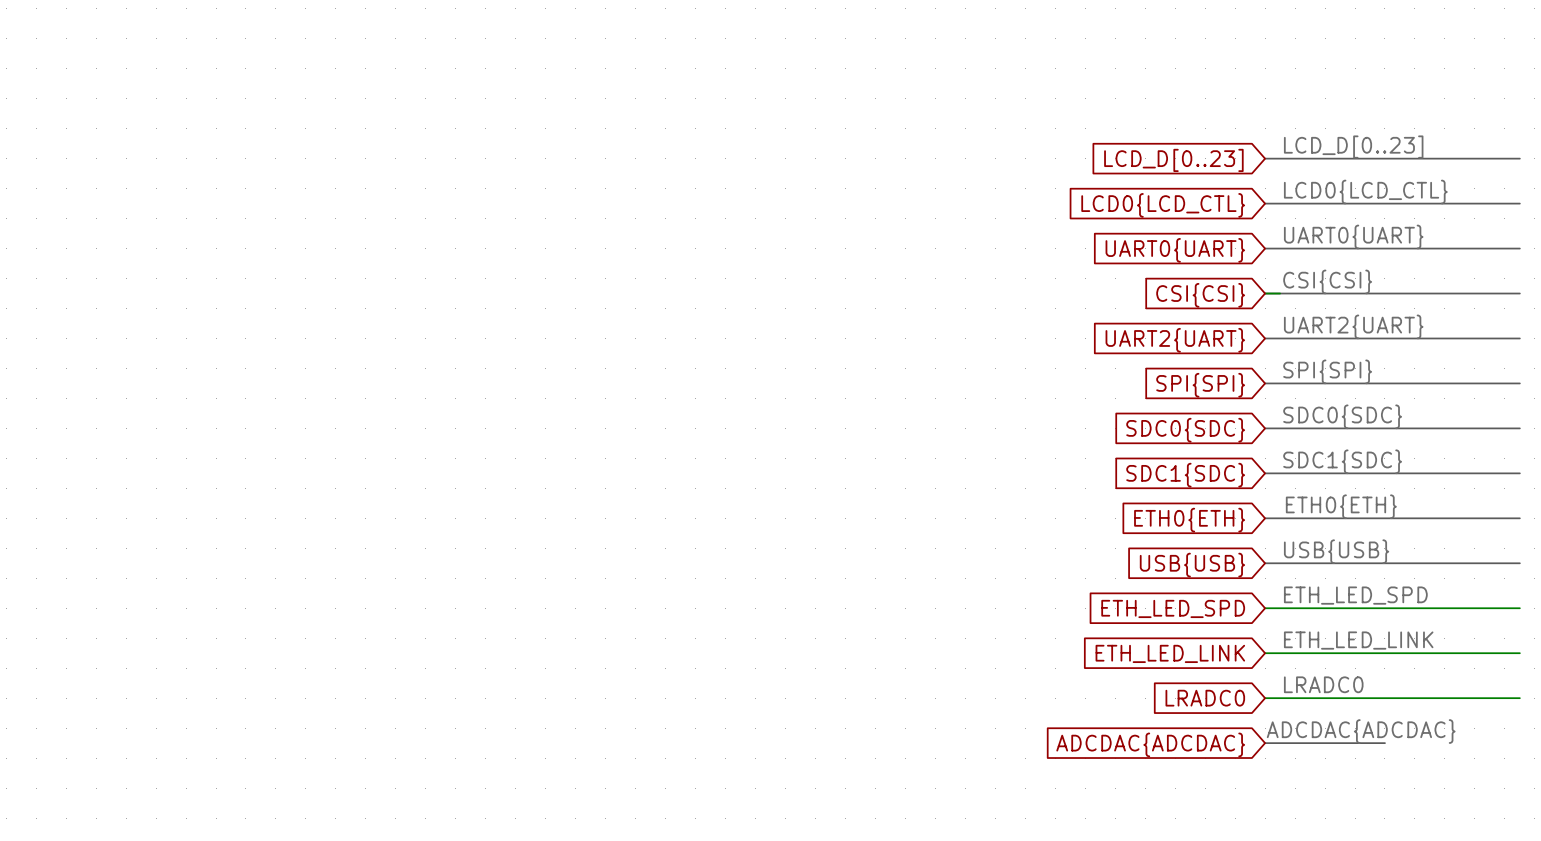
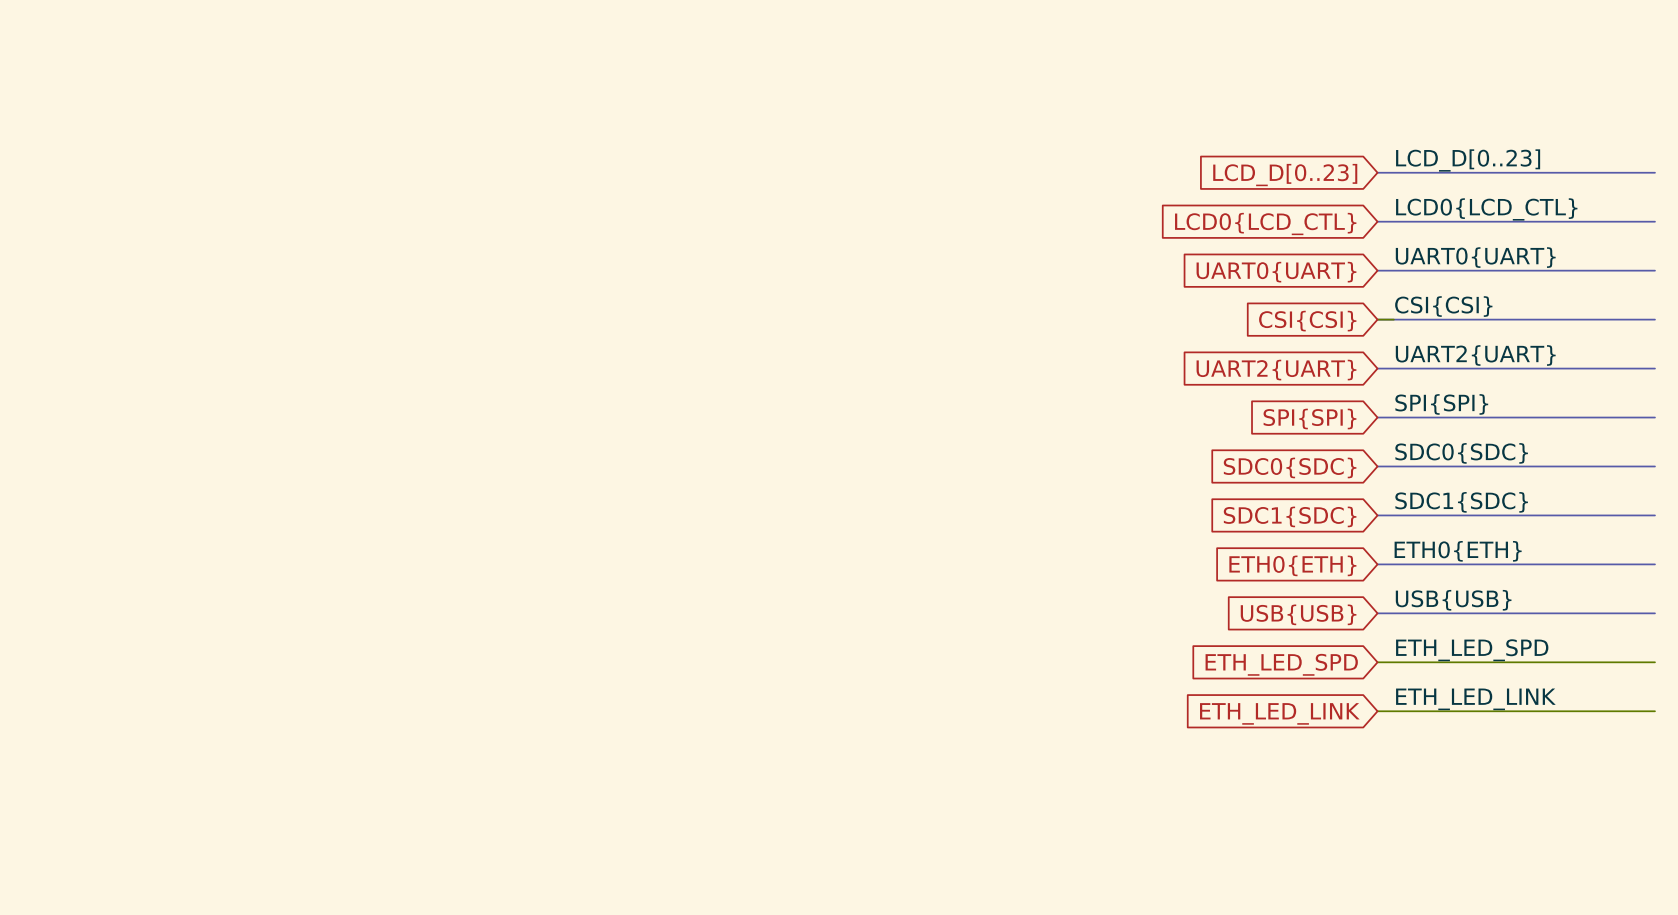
label: LRADC0 (1323, 684) -> none
global label: LRADC0 (1205, 698) -> none
wire: (1265, 698) (1519, 698) -> none
label: ADCDAC{ADCDAC} (1361, 731) -> none
bus: (1265, 743) (1384, 743) -> none
global label: ADCDAC{ADCDAC} (1150, 744) -> none

